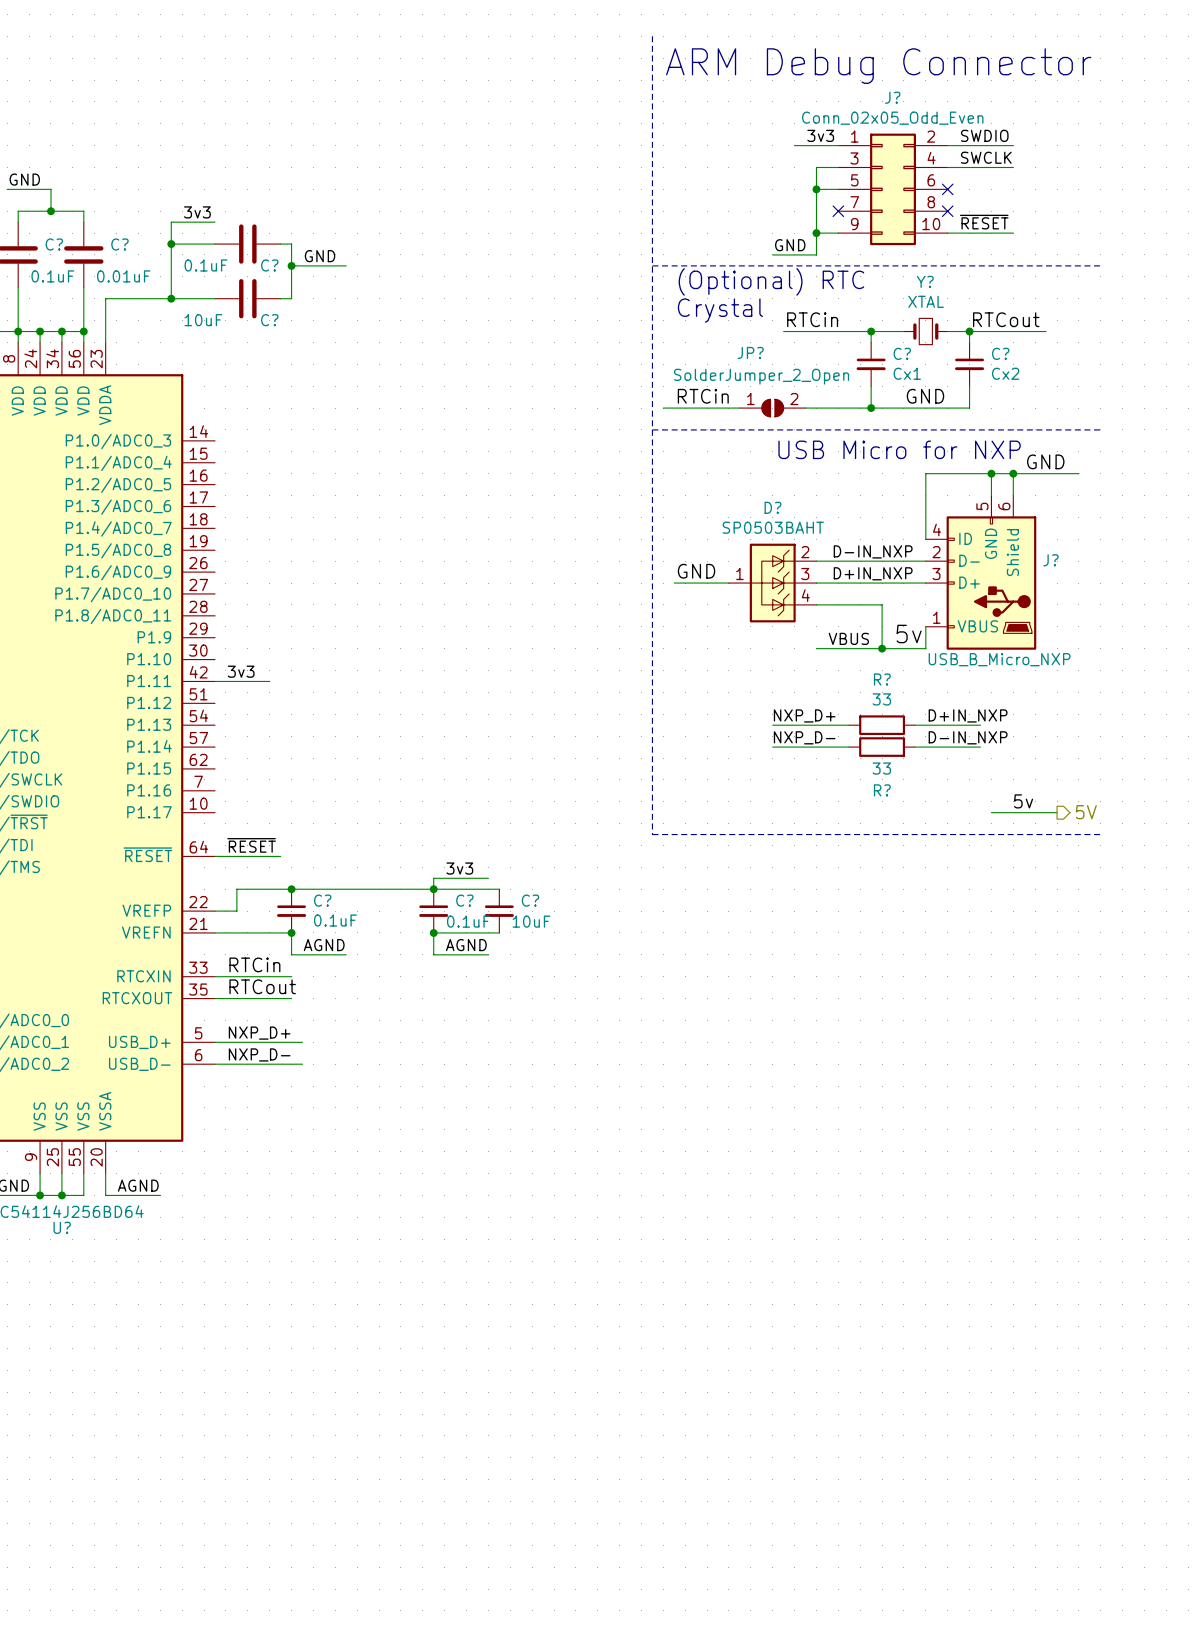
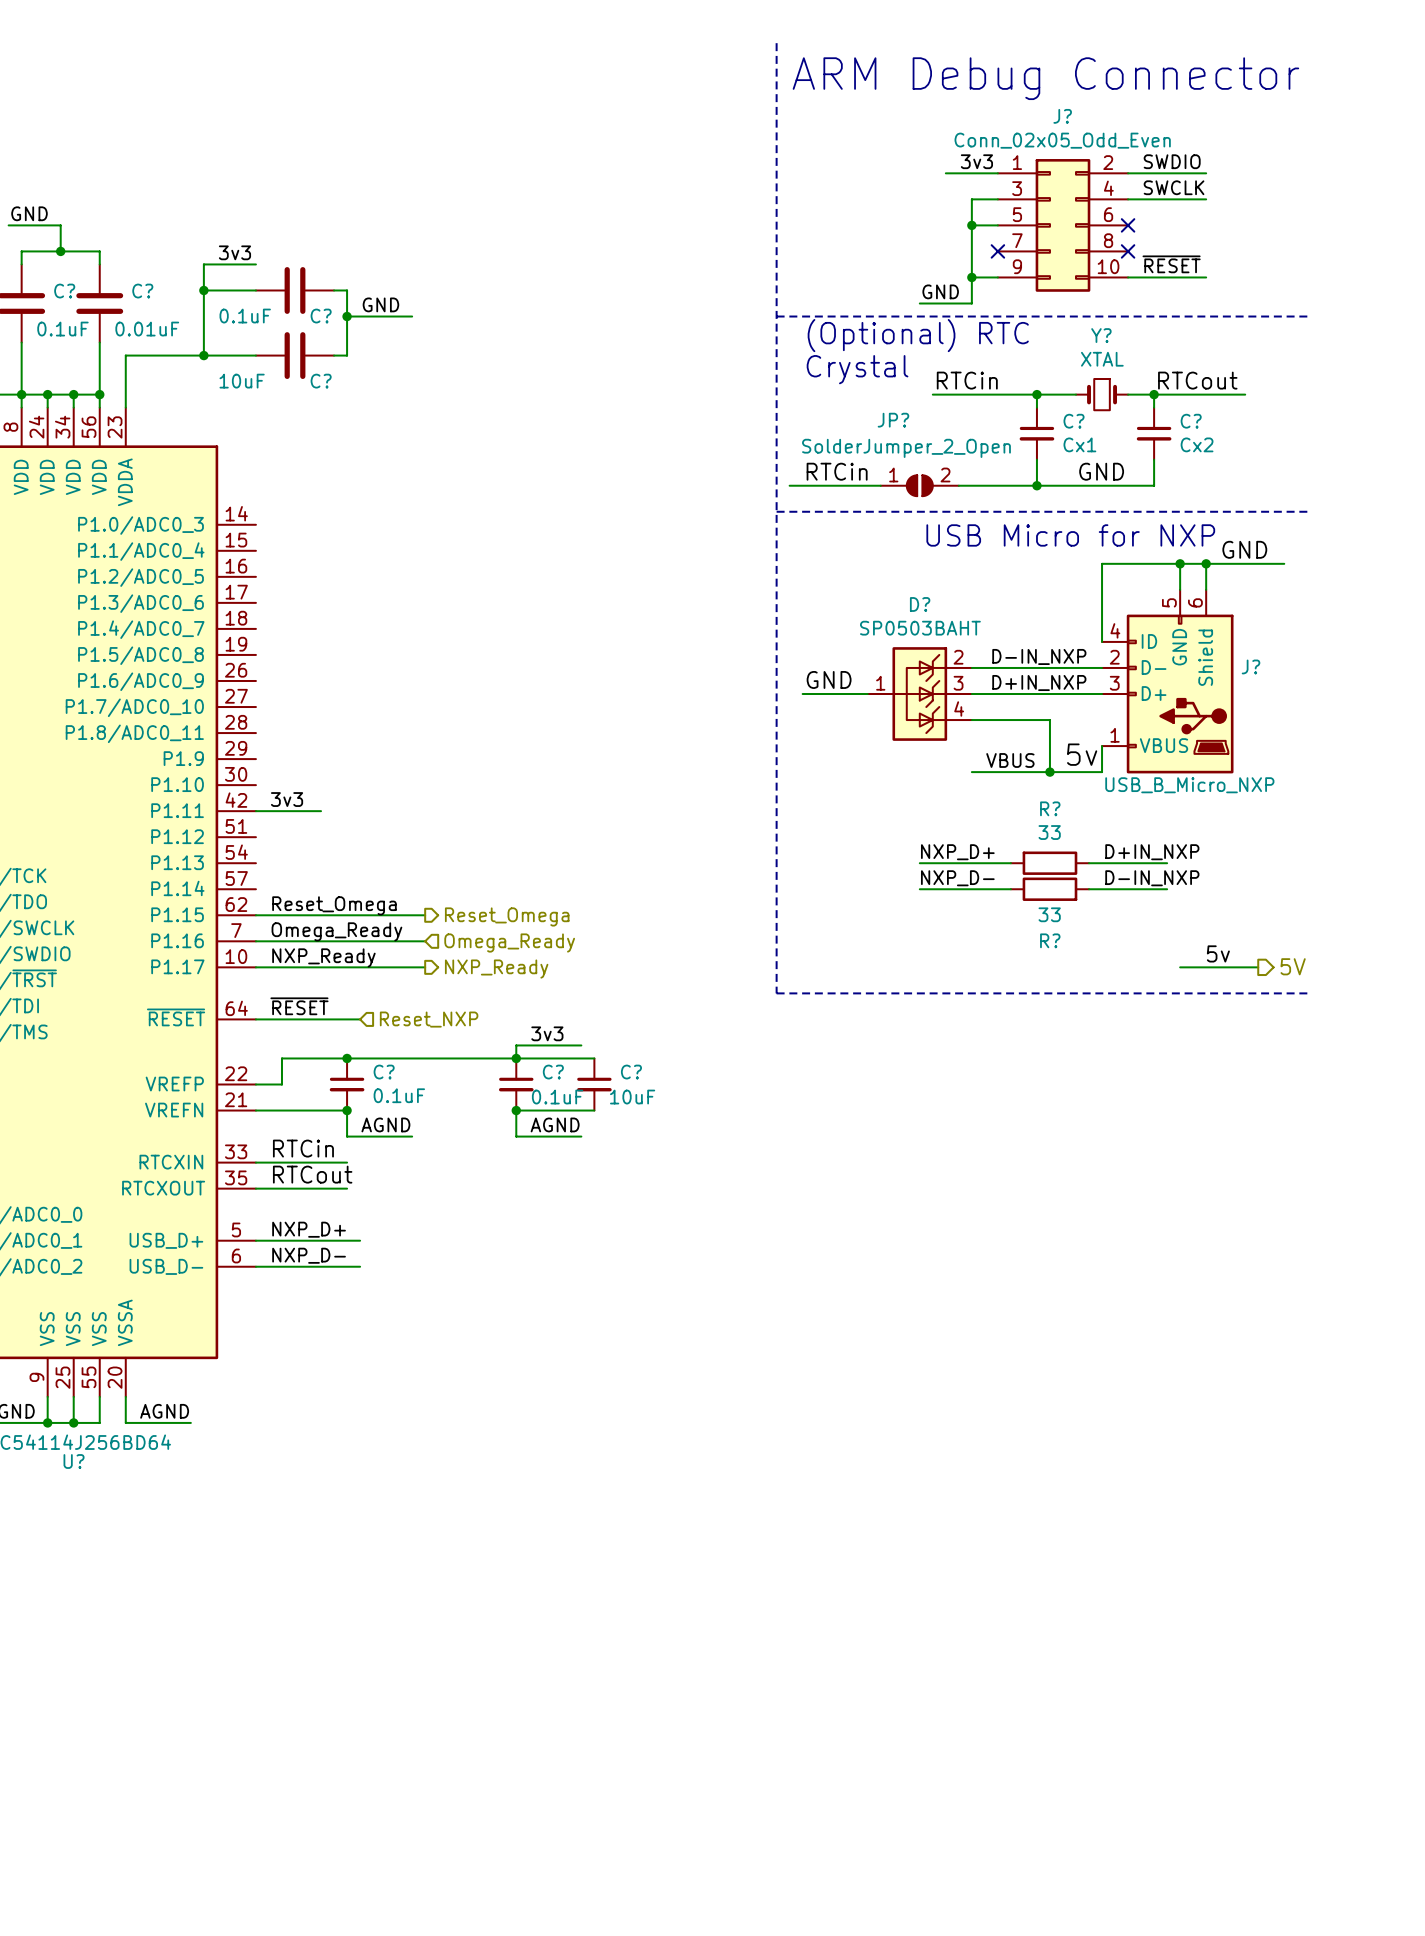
label: none -> Reset_Omega (334, 905)
wire: none -> (255, 915) (425, 915)
hierarchical label: none -> Reset_Omega (507, 916)
label: none -> Omega_Ready (336, 931)
wire: none -> (255, 941) (425, 941)
hierarchical label: none -> Omega_Ready (509, 943)
label: none -> NXP_Ready (323, 957)
wire: none -> (255, 967) (425, 967)
hierarchical label: none -> NXP_Ready (496, 969)
wire: none -> (334, 1019) (360, 1019)
hierarchical label: none -> Reset_NXP (429, 1019)

